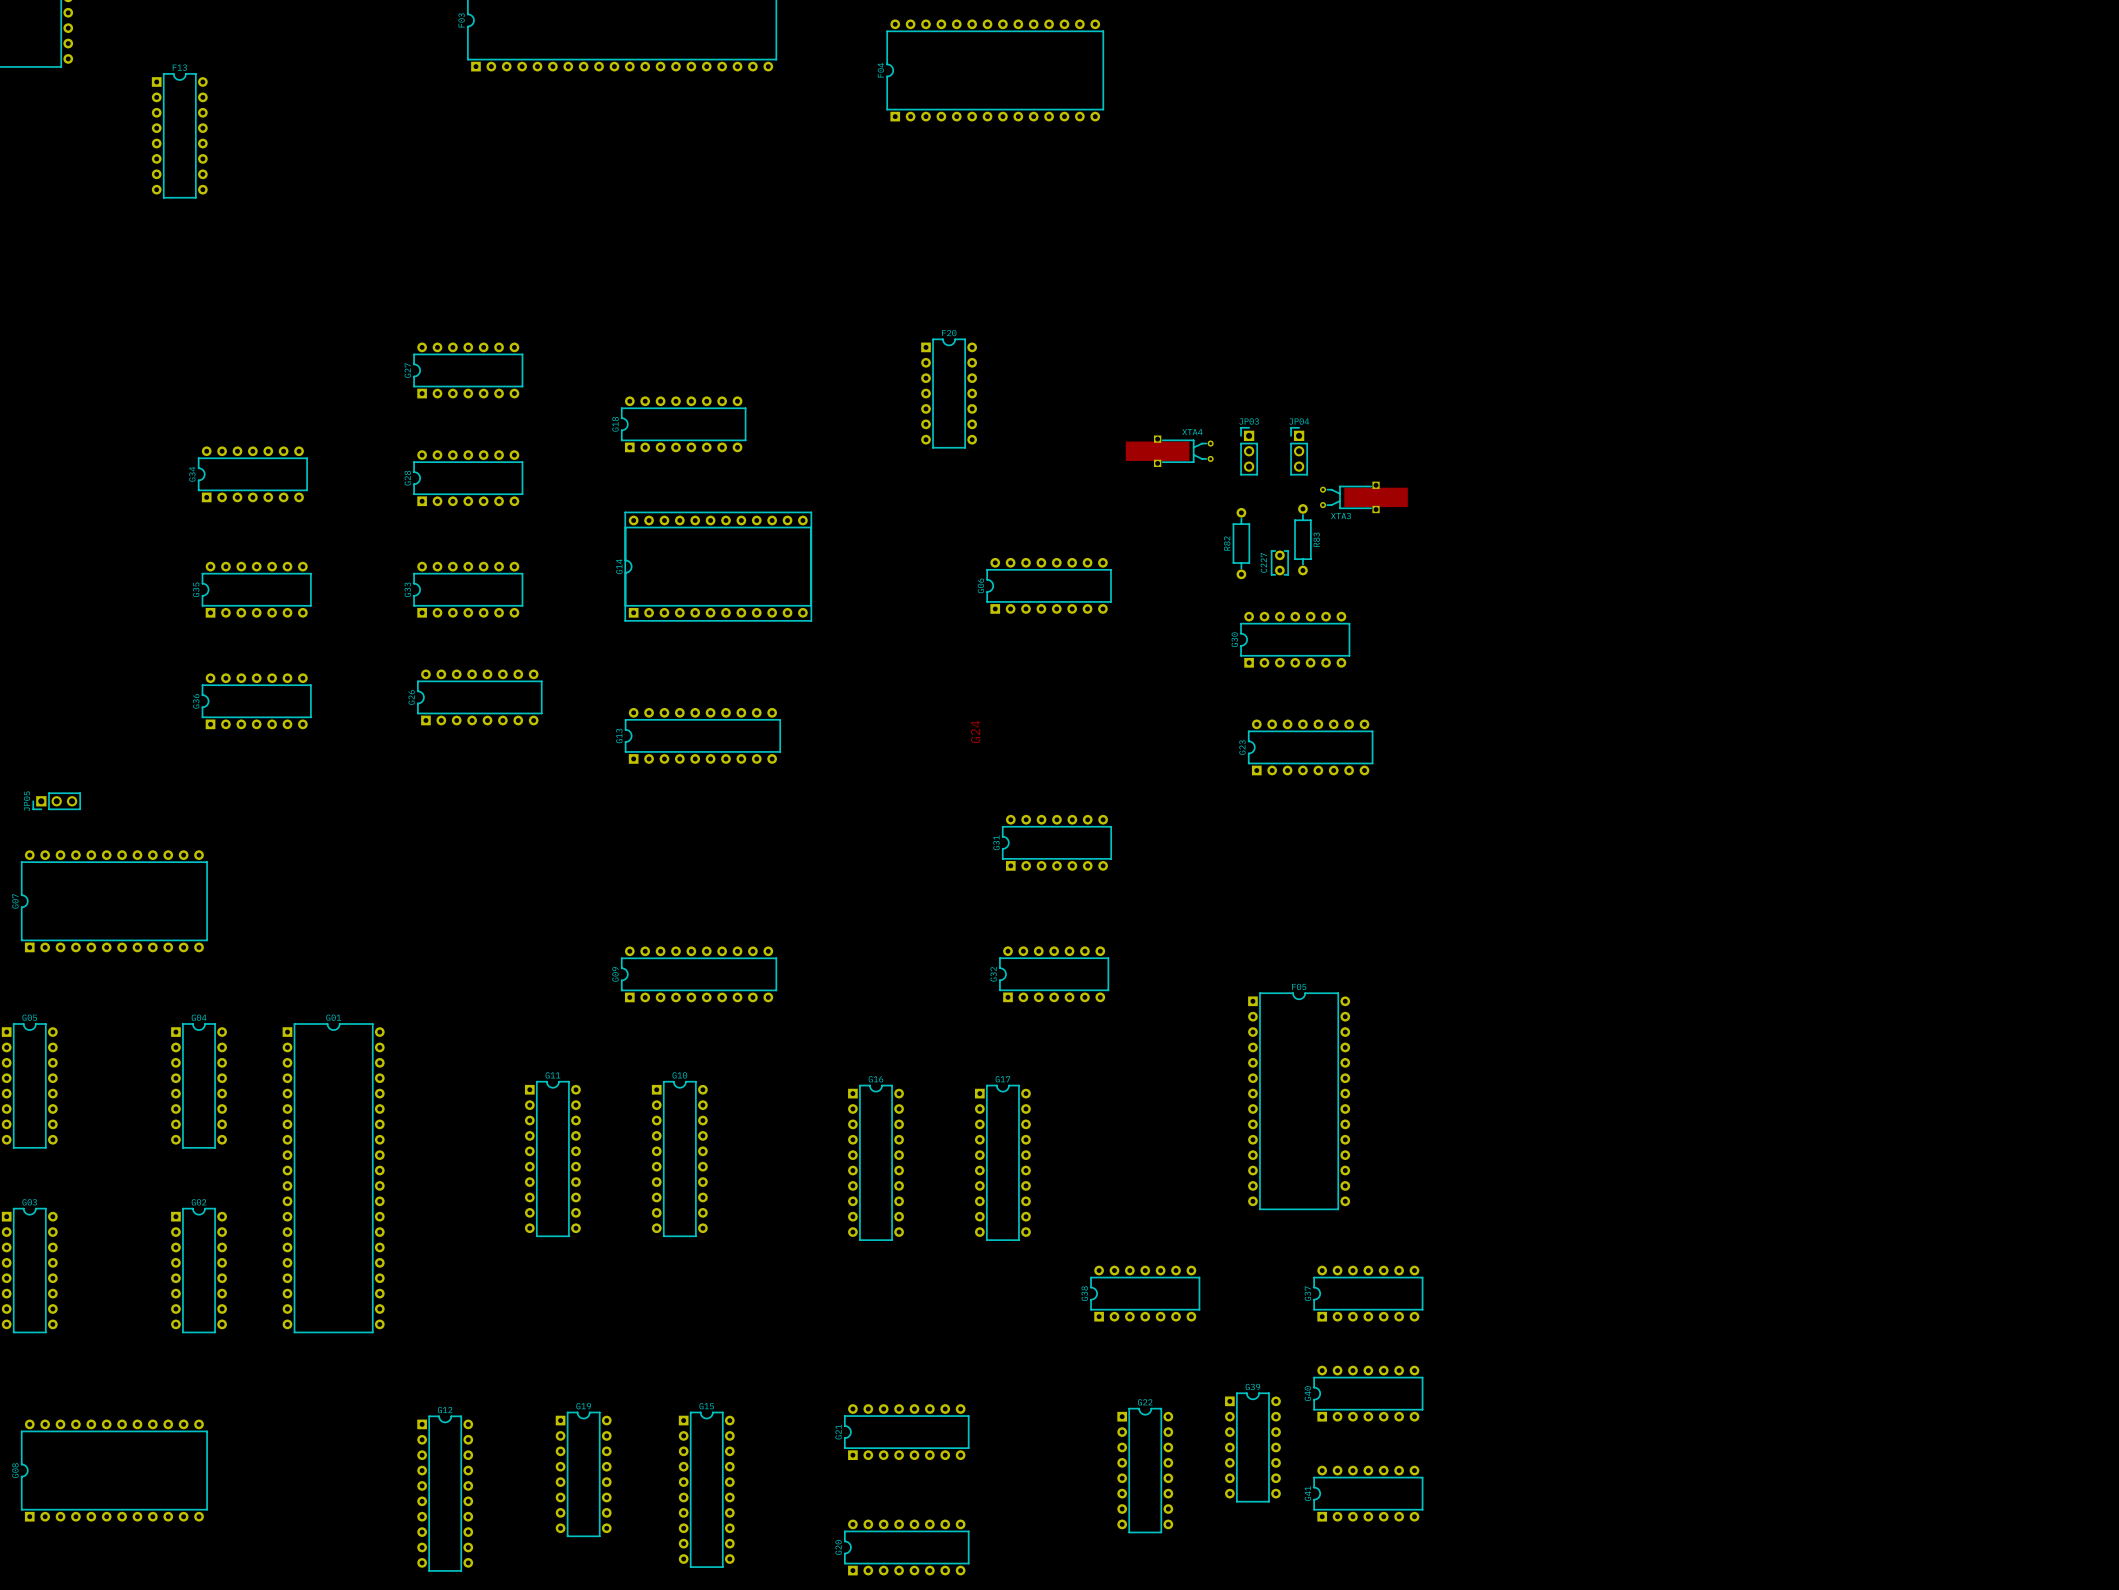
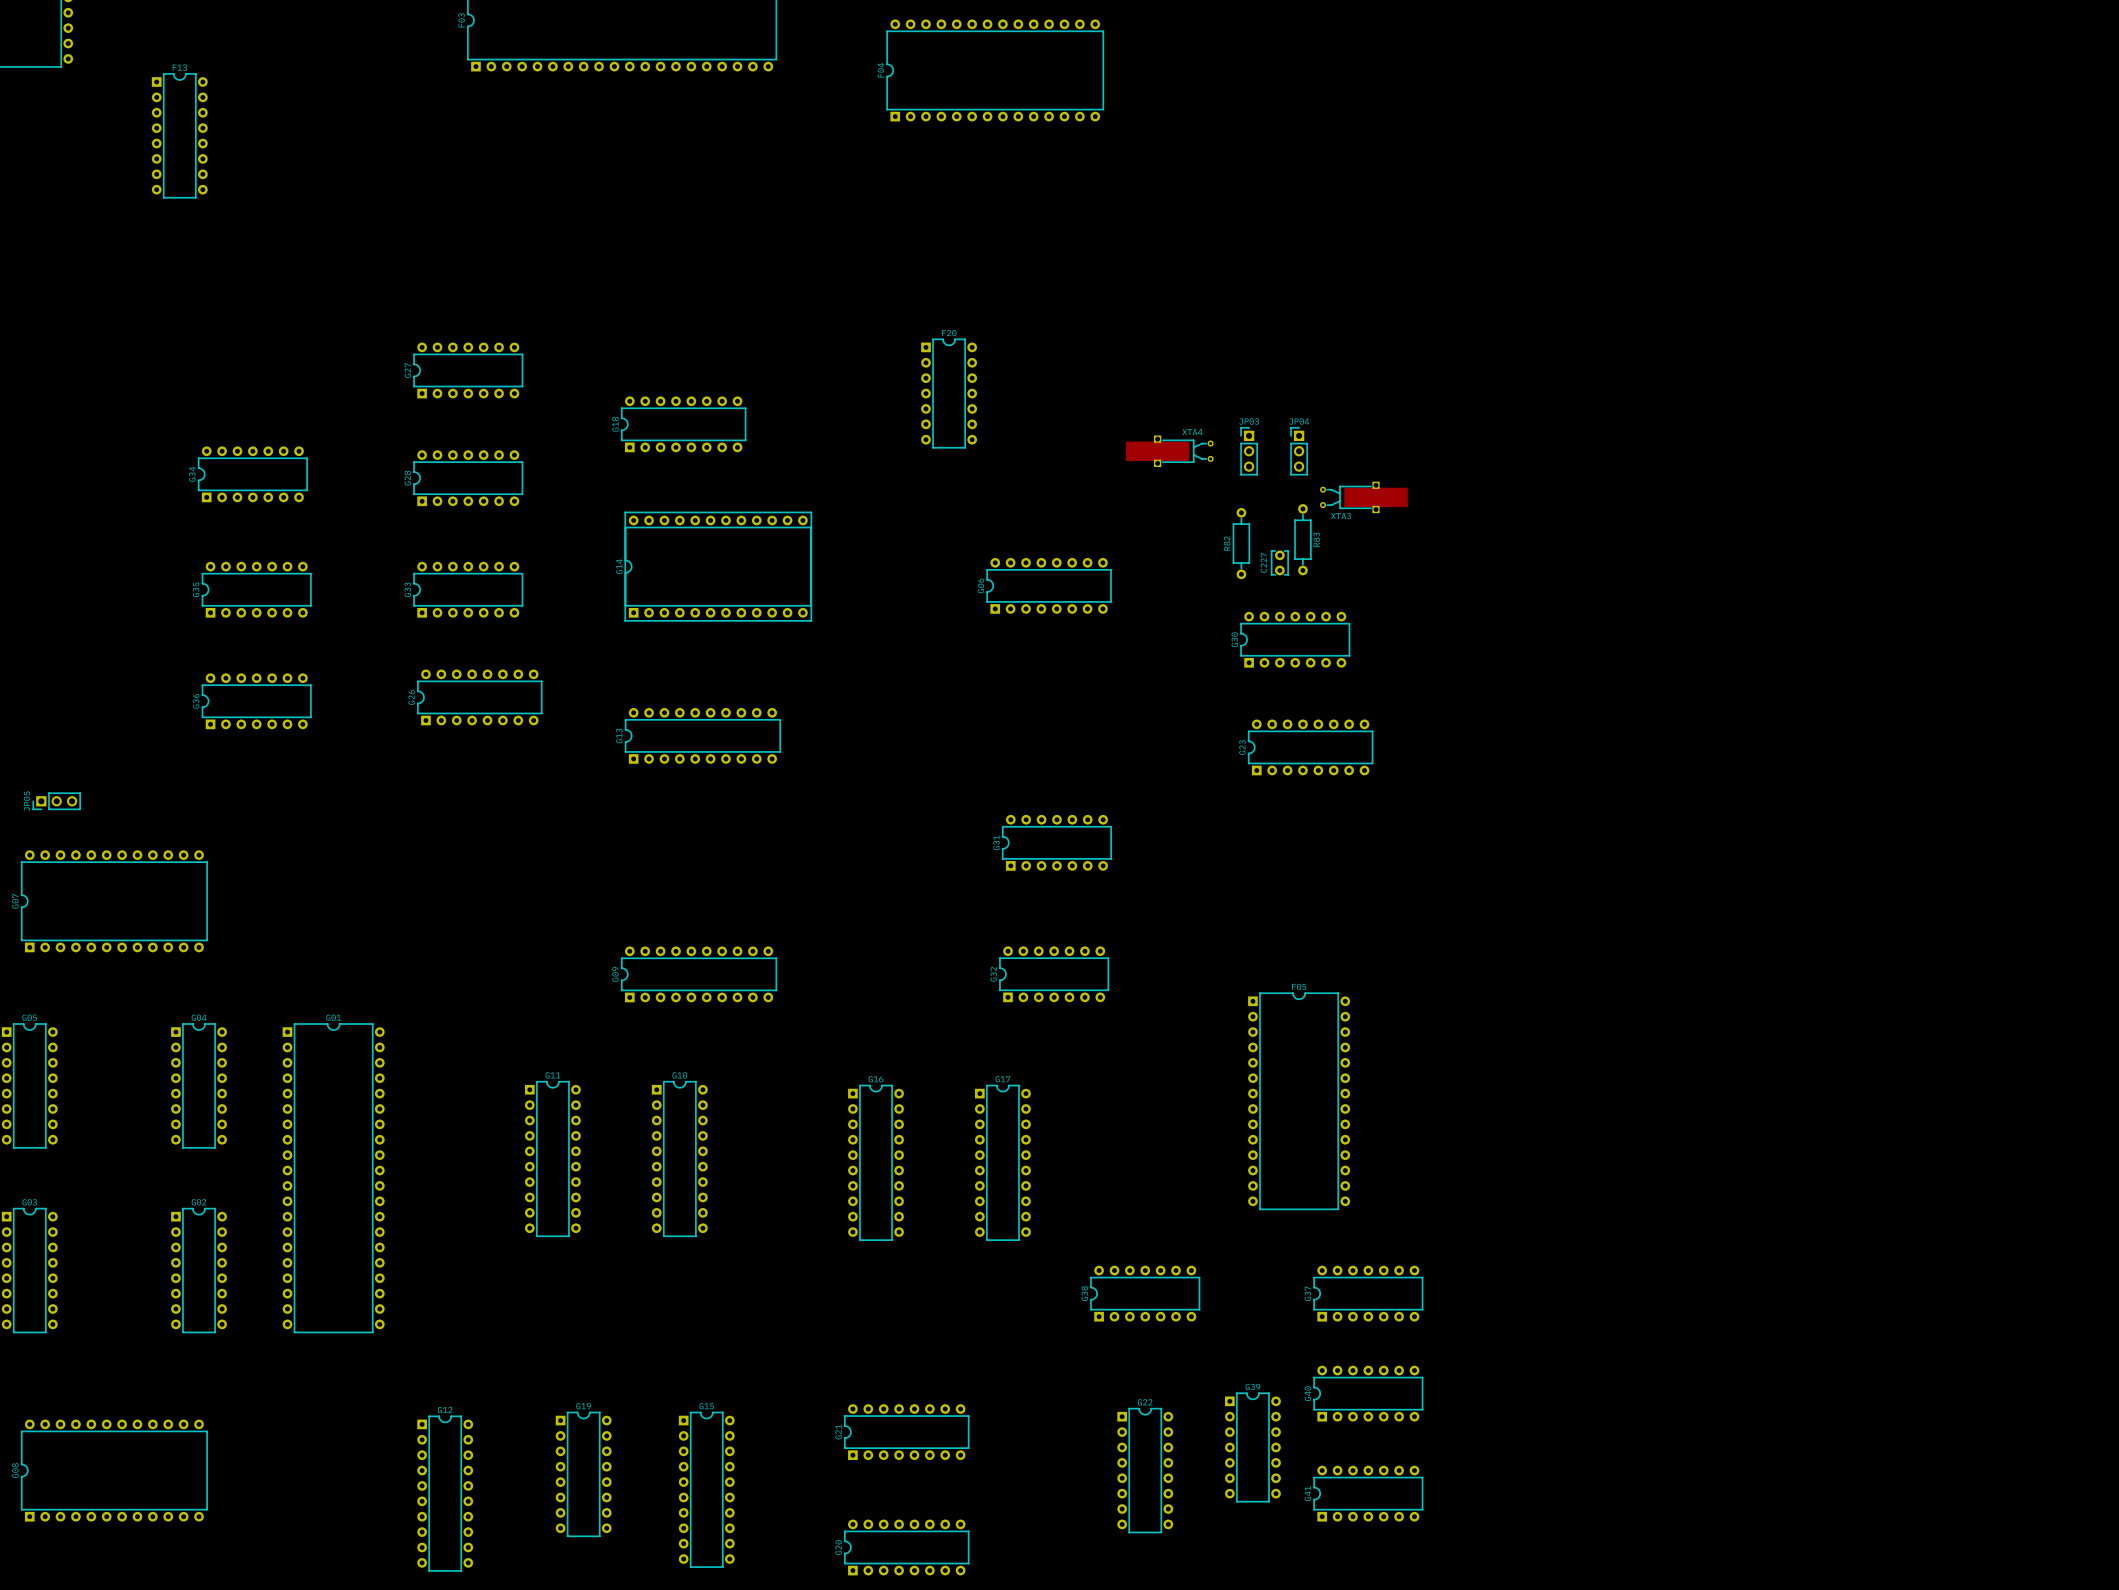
text: G24 (975, 731) -> none

